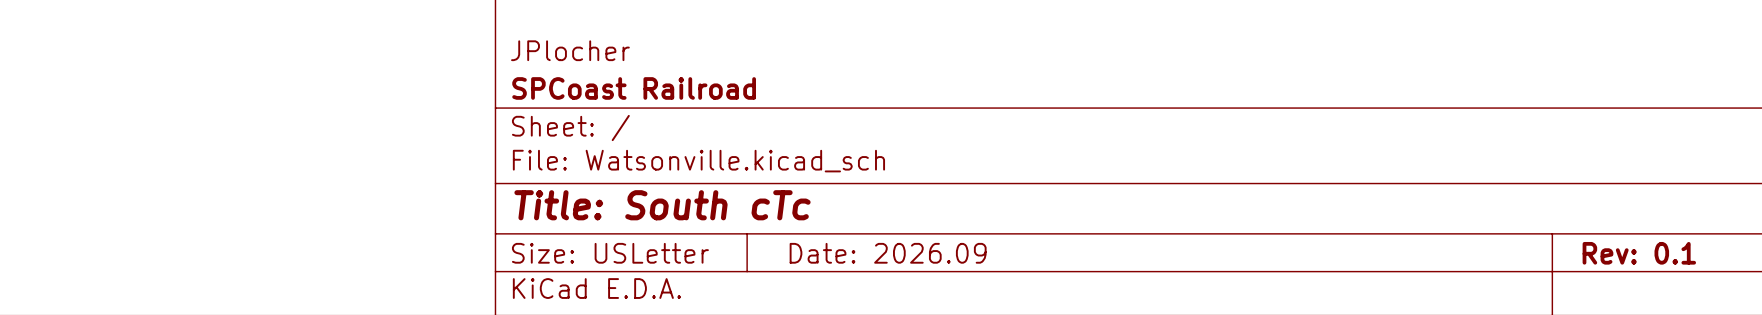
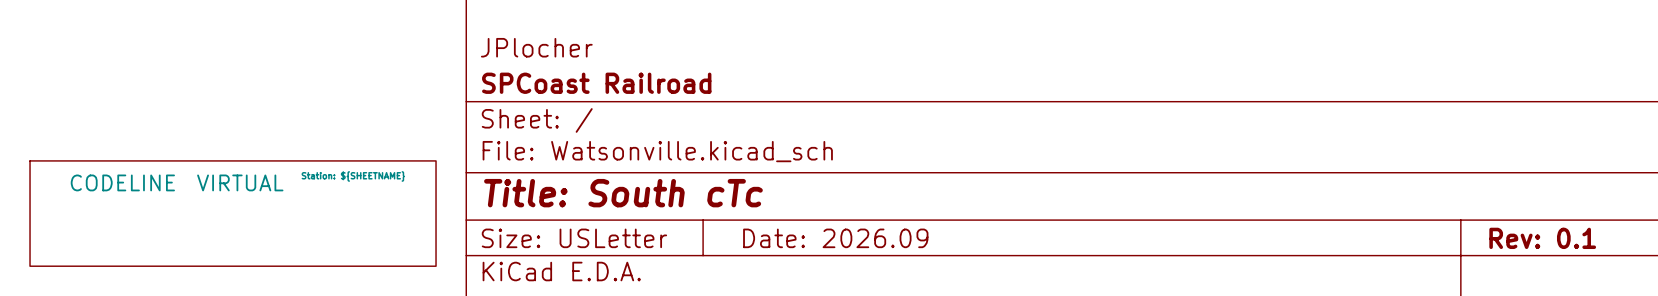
part: none -> VIRTUAL (233, 213)

